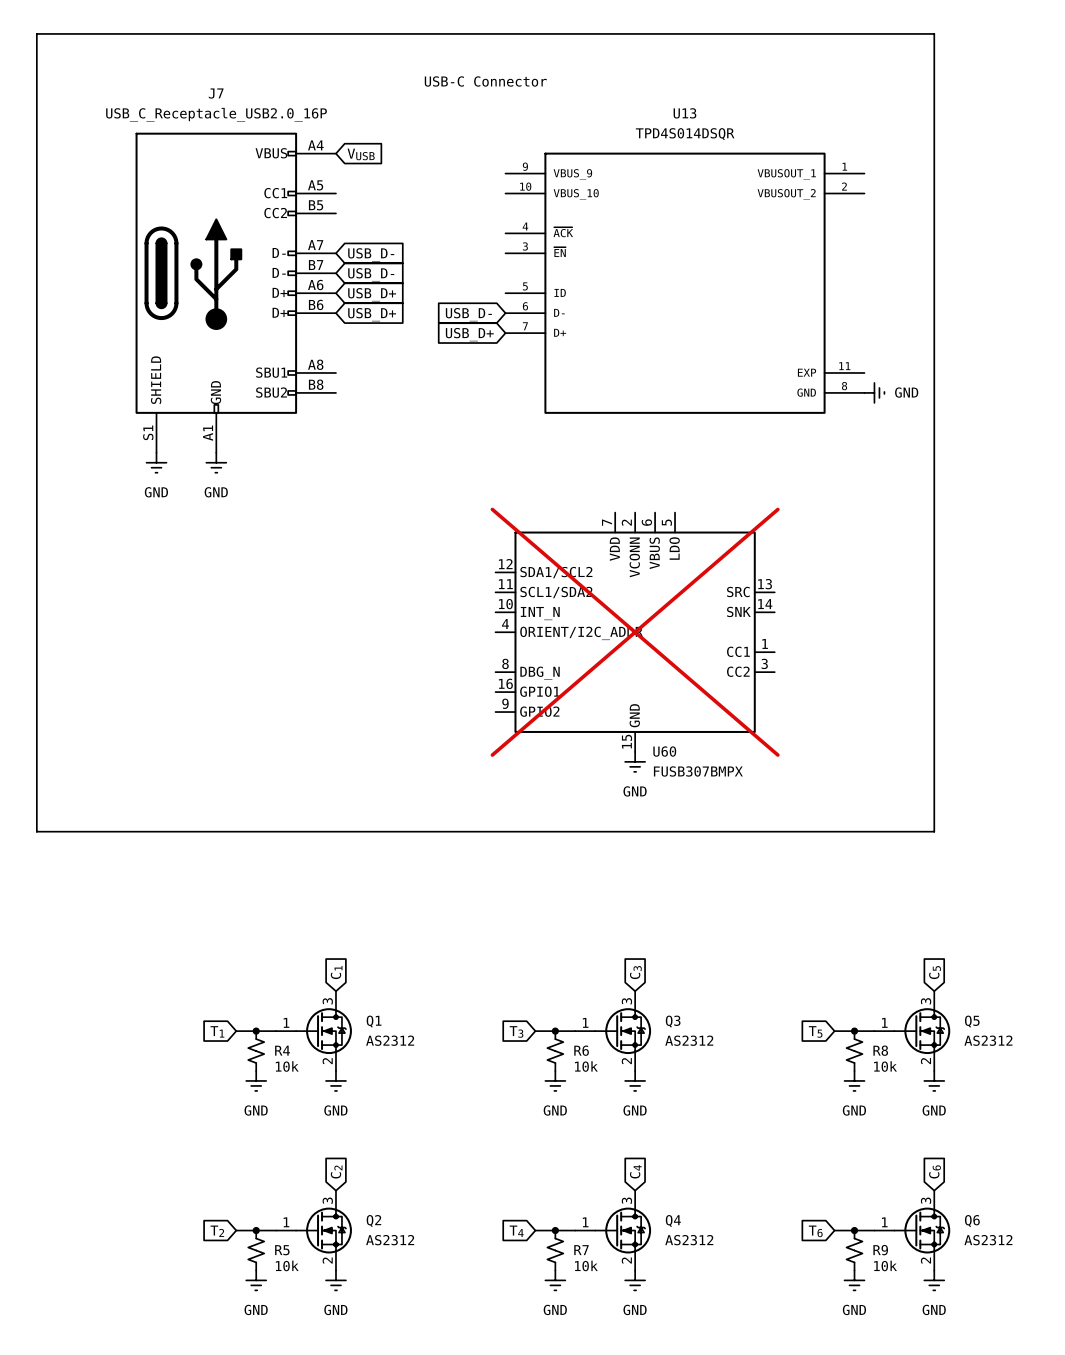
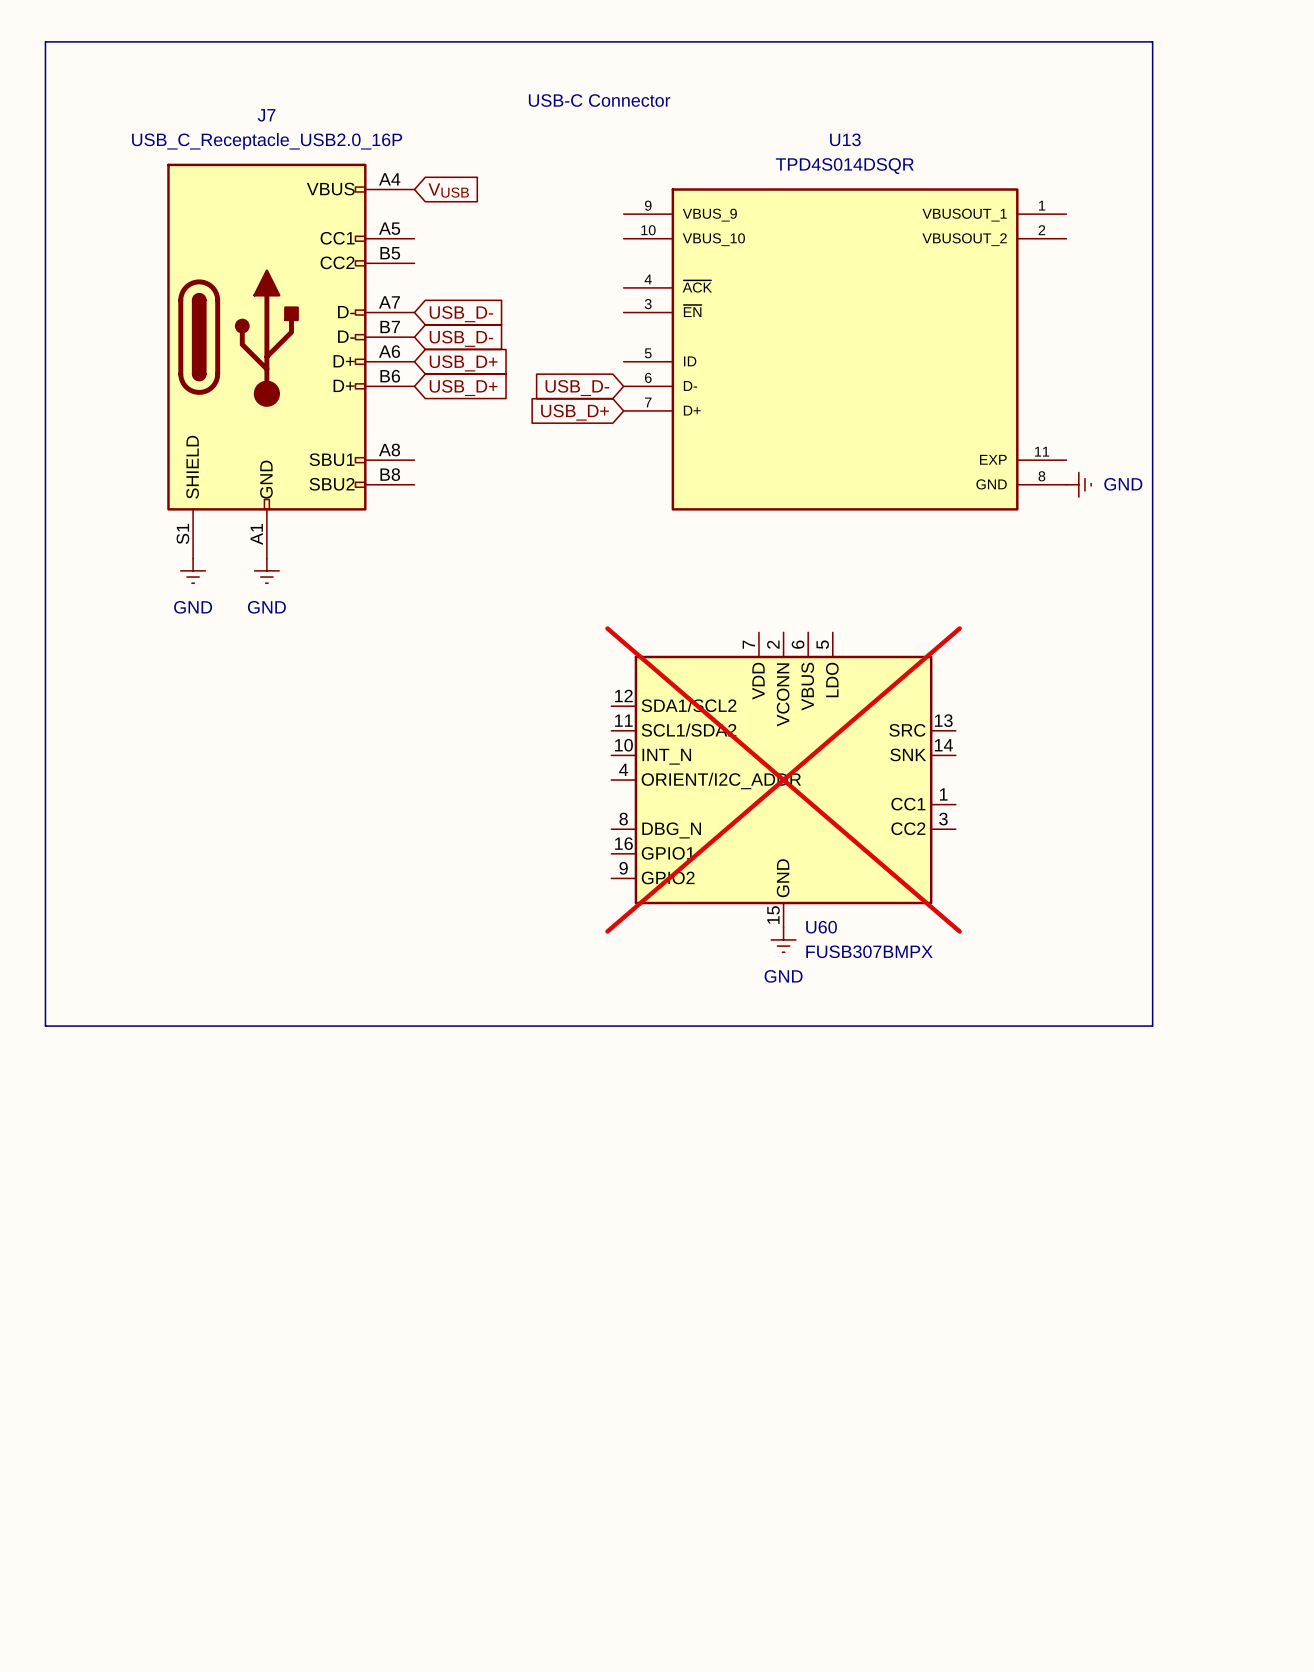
global label: C1 (336, 972) -> none
global label: C3 (635, 972) -> none
global label: C5 (935, 972) -> none
global label: T1 (217, 1031) -> none
wire: (236, 1031) (276, 1031) -> none
junction: (256, 1031) -> none
Q1: AS2312 (314, 1031) -> none
global label: T3 (516, 1031) -> none
wire: (535, 1031) (575, 1031) -> none
junction: (555, 1031) -> none
Q3: AS2312 (613, 1031) -> none
global label: T5 (815, 1031) -> none
wire: (834, 1031) (874, 1031) -> none
junction: (854, 1031) -> none
Q5: AS2312 (912, 1031) -> none
R4: 10k (256, 1051) -> none
R6: 10k (555, 1051) -> none
R8: 10k (854, 1051) -> none
power symbol: GND (256, 1080) -> none
power symbol: GND (335, 1080) -> none
power symbol: GND (555, 1080) -> none
power symbol: GND (635, 1080) -> none
power symbol: GND (854, 1080) -> none
power symbol: GND (934, 1080) -> none
global label: C4 (635, 1171) -> none
global label: C6 (935, 1171) -> none
global label: C2 (336, 1172) -> none
wire: (236, 1230) (276, 1230) -> none
junction: (256, 1230) -> none
Q2: AS2312 (314, 1230) -> none
wire: (535, 1230) (575, 1230) -> none
junction: (555, 1230) -> none
Q4: AS2312 (613, 1230) -> none
wire: (834, 1230) (874, 1230) -> none
junction: (854, 1230) -> none
Q6: AS2312 (912, 1230) -> none
global label: T2 (217, 1231) -> none
global label: T4 (516, 1231) -> none
global label: T6 (815, 1231) -> none
R5: 10k (256, 1250) -> none
R7: 10k (555, 1250) -> none
R9: 10k (854, 1250) -> none
power symbol: GND (256, 1280) -> none
power symbol: GND (335, 1280) -> none
power symbol: GND (555, 1280) -> none
power symbol: GND (635, 1280) -> none
power symbol: GND (854, 1280) -> none
power symbol: GND (934, 1280) -> none

